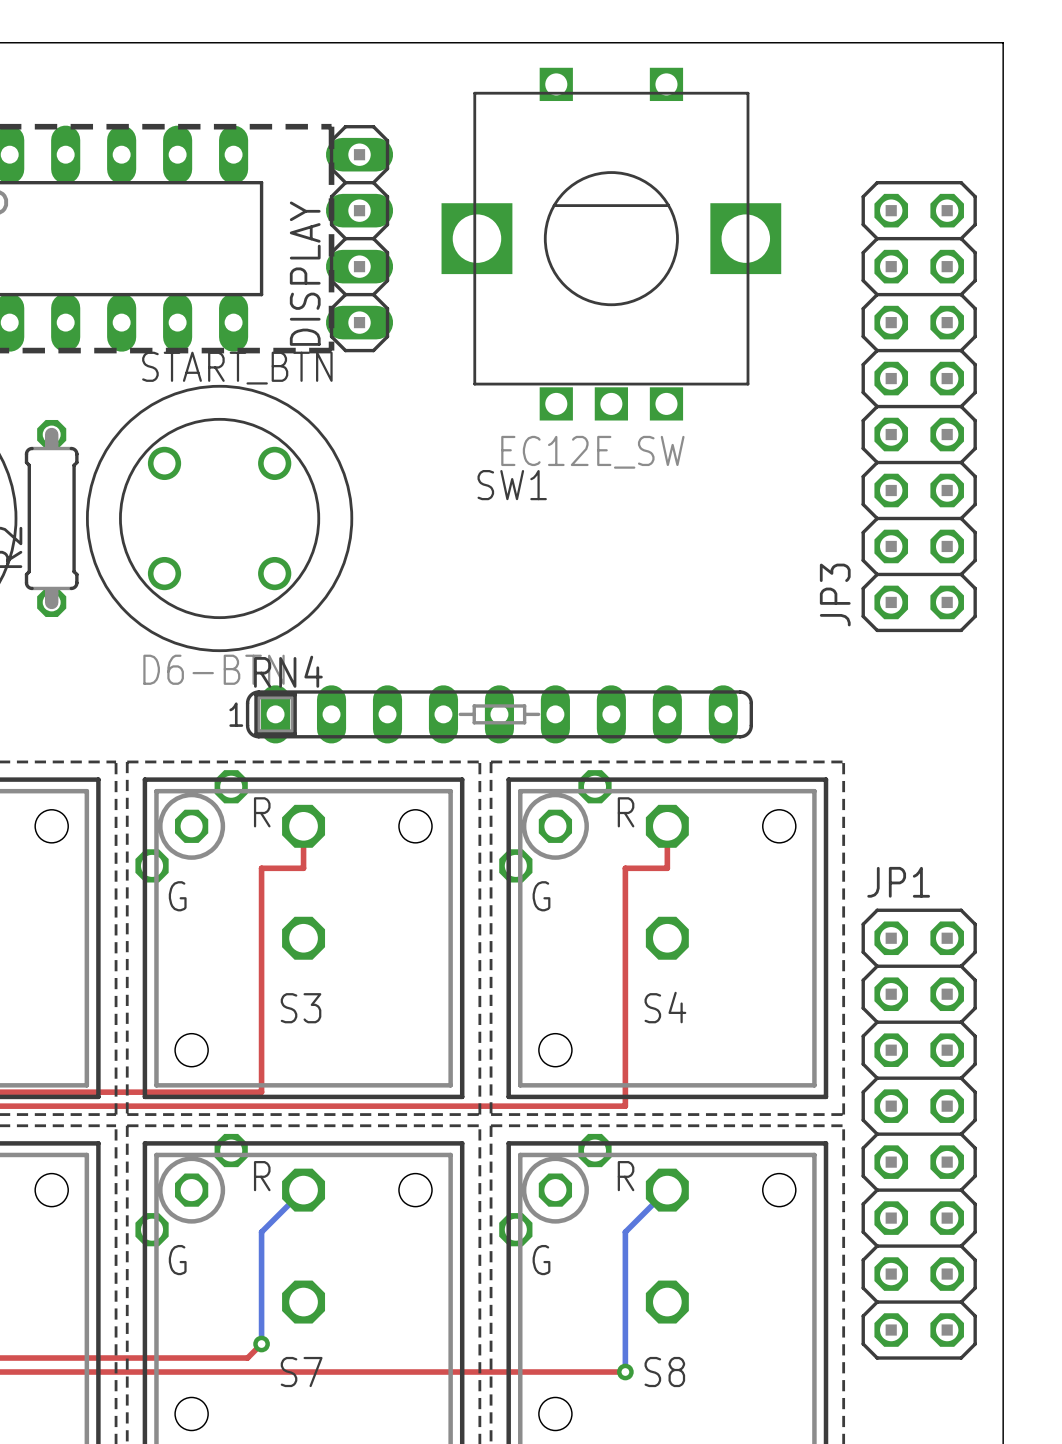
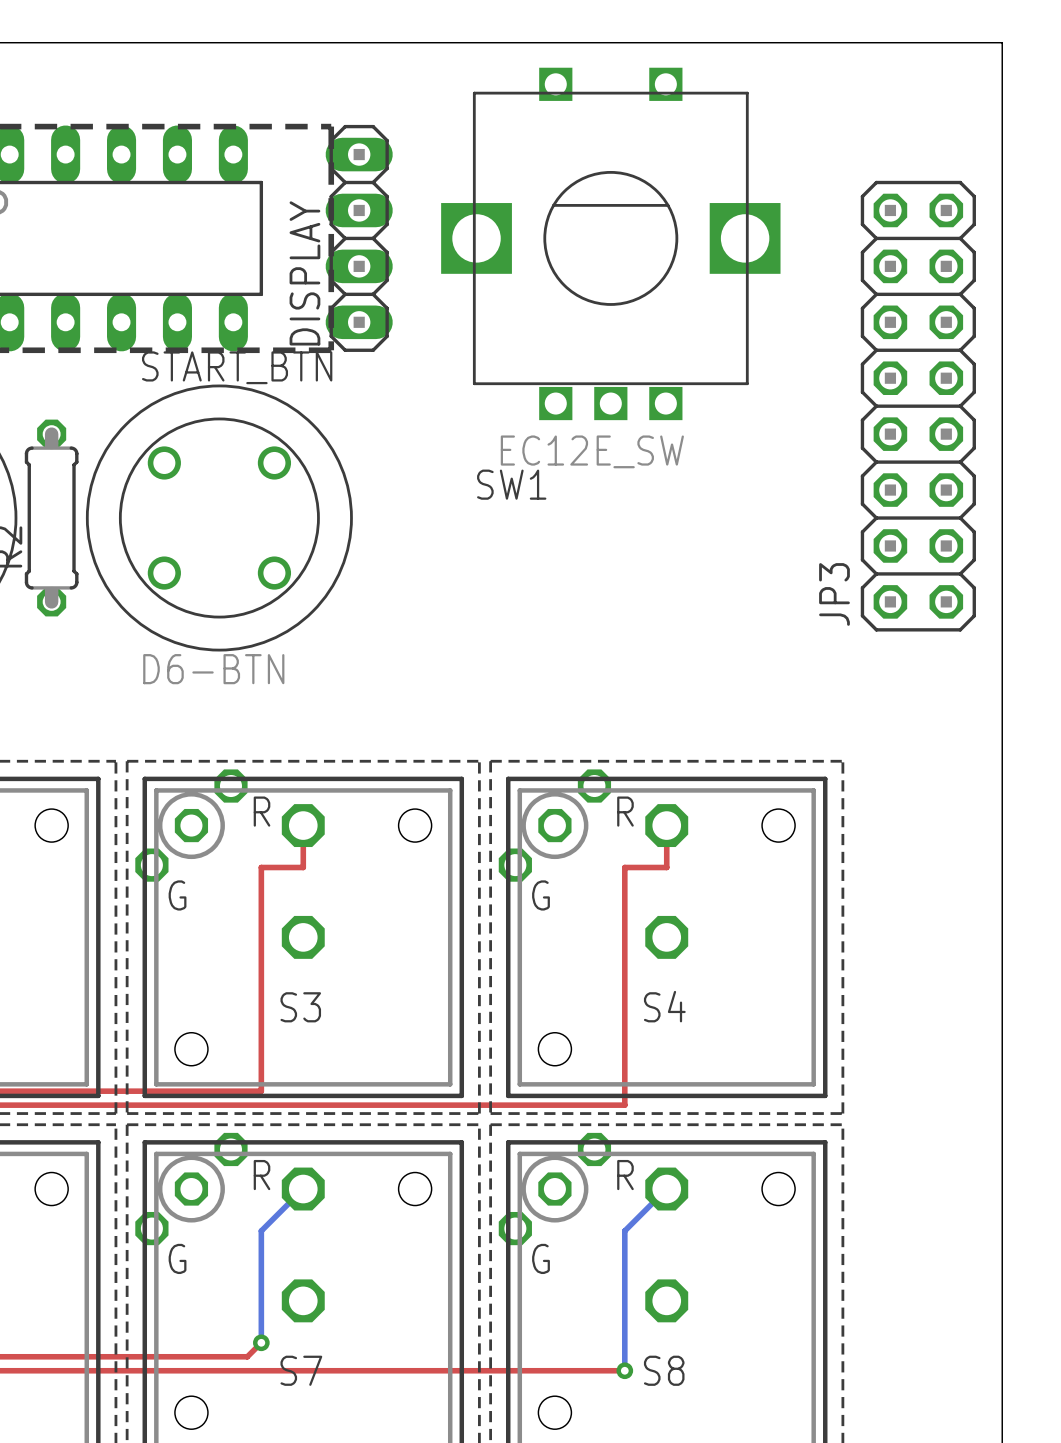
RN4: (499, 714) -> none
JP1: (919, 1134) -> none

